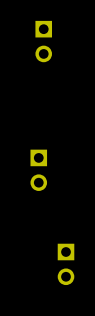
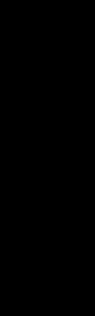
part: (43, 41) -> none
part: (38, 170) -> none
part: (66, 264) -> none

